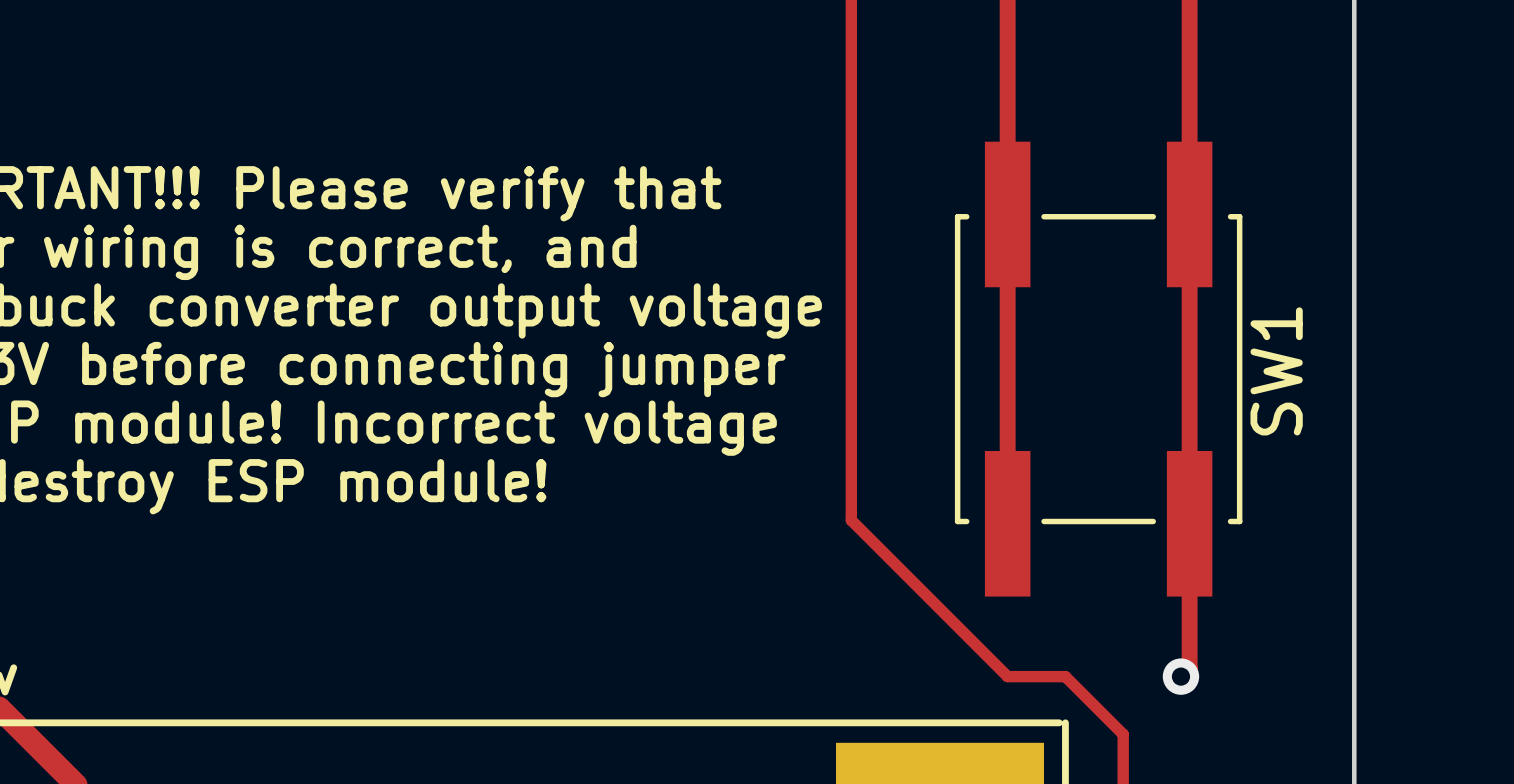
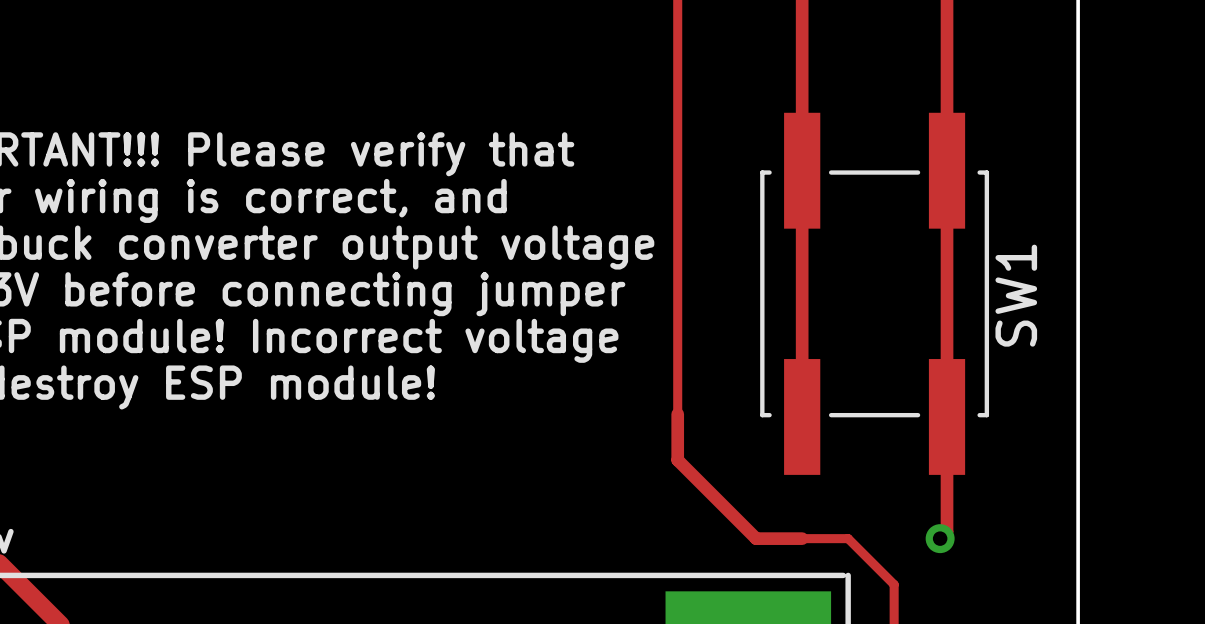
track: (851, 520) (1007, 676) -> (677, 414) (677, 460) (756, 538) (802, 538)

